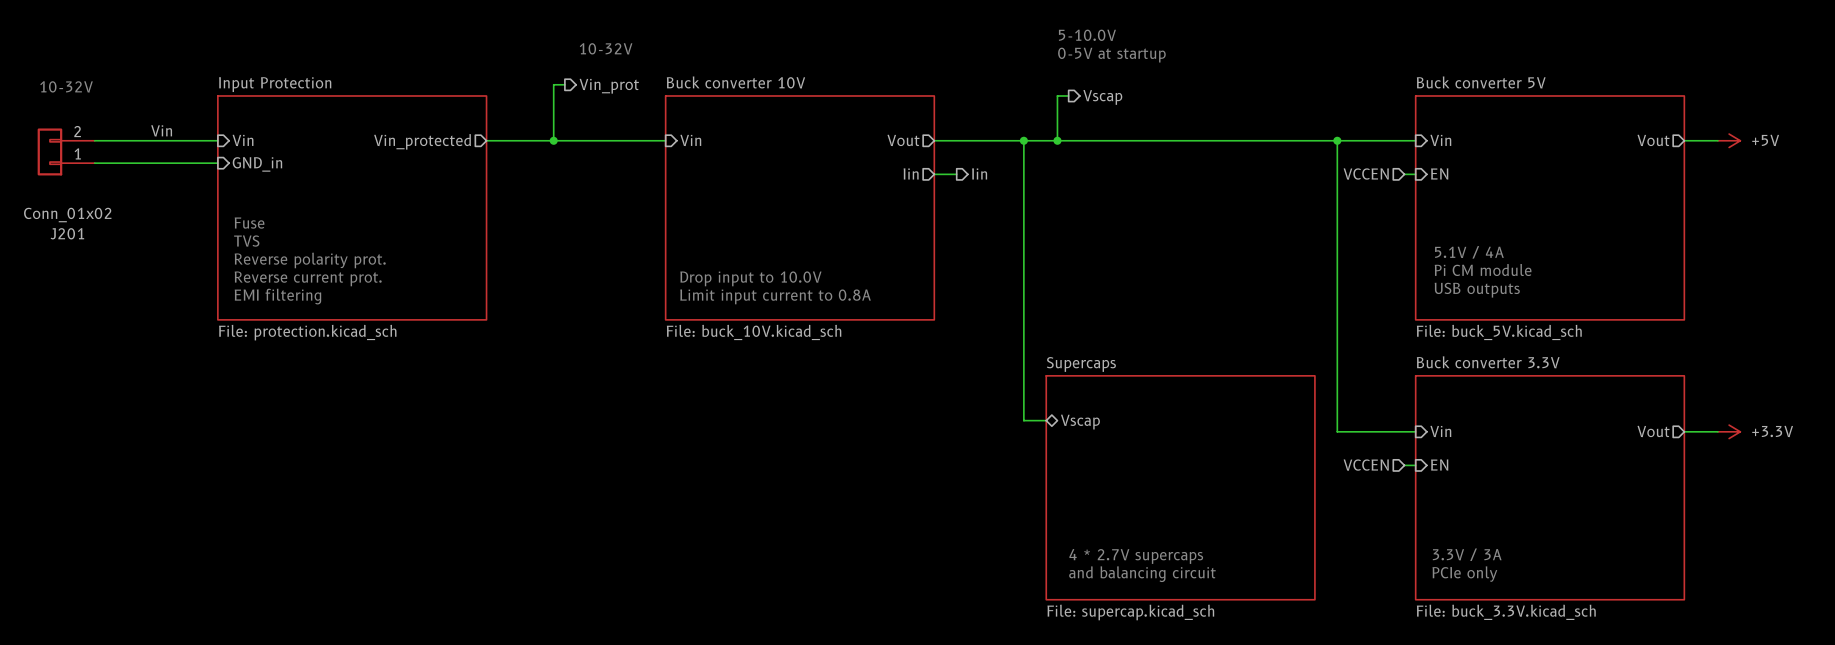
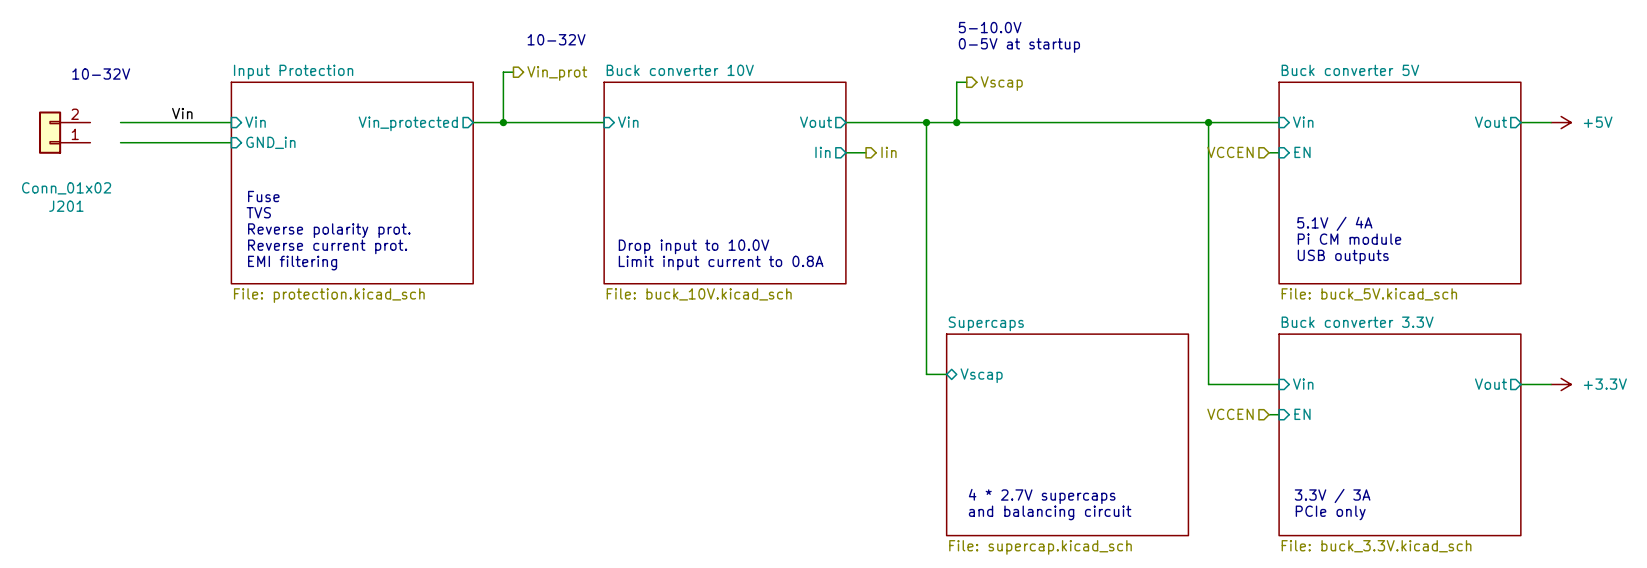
text position: 10-32V (66, 86) -> 10-32V (101, 74)
label position: Vin (161, 130) -> Vin (182, 113)
wire: (94, 140) (128, 140) -> (201, 122) (231, 122)
sheet pin position: Vin (243, 140) -> Vin (255, 122)
wire: (486, 140) (520, 140) -> none
sheet pin position: Vin_protected (422, 141) -> Vin_protected (408, 123)
wire: (94, 163) (128, 163) -> (201, 142) (231, 142)
sheet pin position: GND_in (257, 164) -> GND_in (270, 142)
sheet Input Protection position: (352, 207) -> (352, 183)
text position: Fuse (249, 223) -> Fuse (263, 196)
text position: TVS (246, 241) -> TVS (258, 212)
text position: Reverse polarity prot. (310, 260) -> Reverse polarity prot. (329, 230)
text position: Reverse current prot. (308, 278) -> Reverse current prot. (327, 246)
text position: EMI filtering (277, 296) -> EMI filtering (292, 263)

